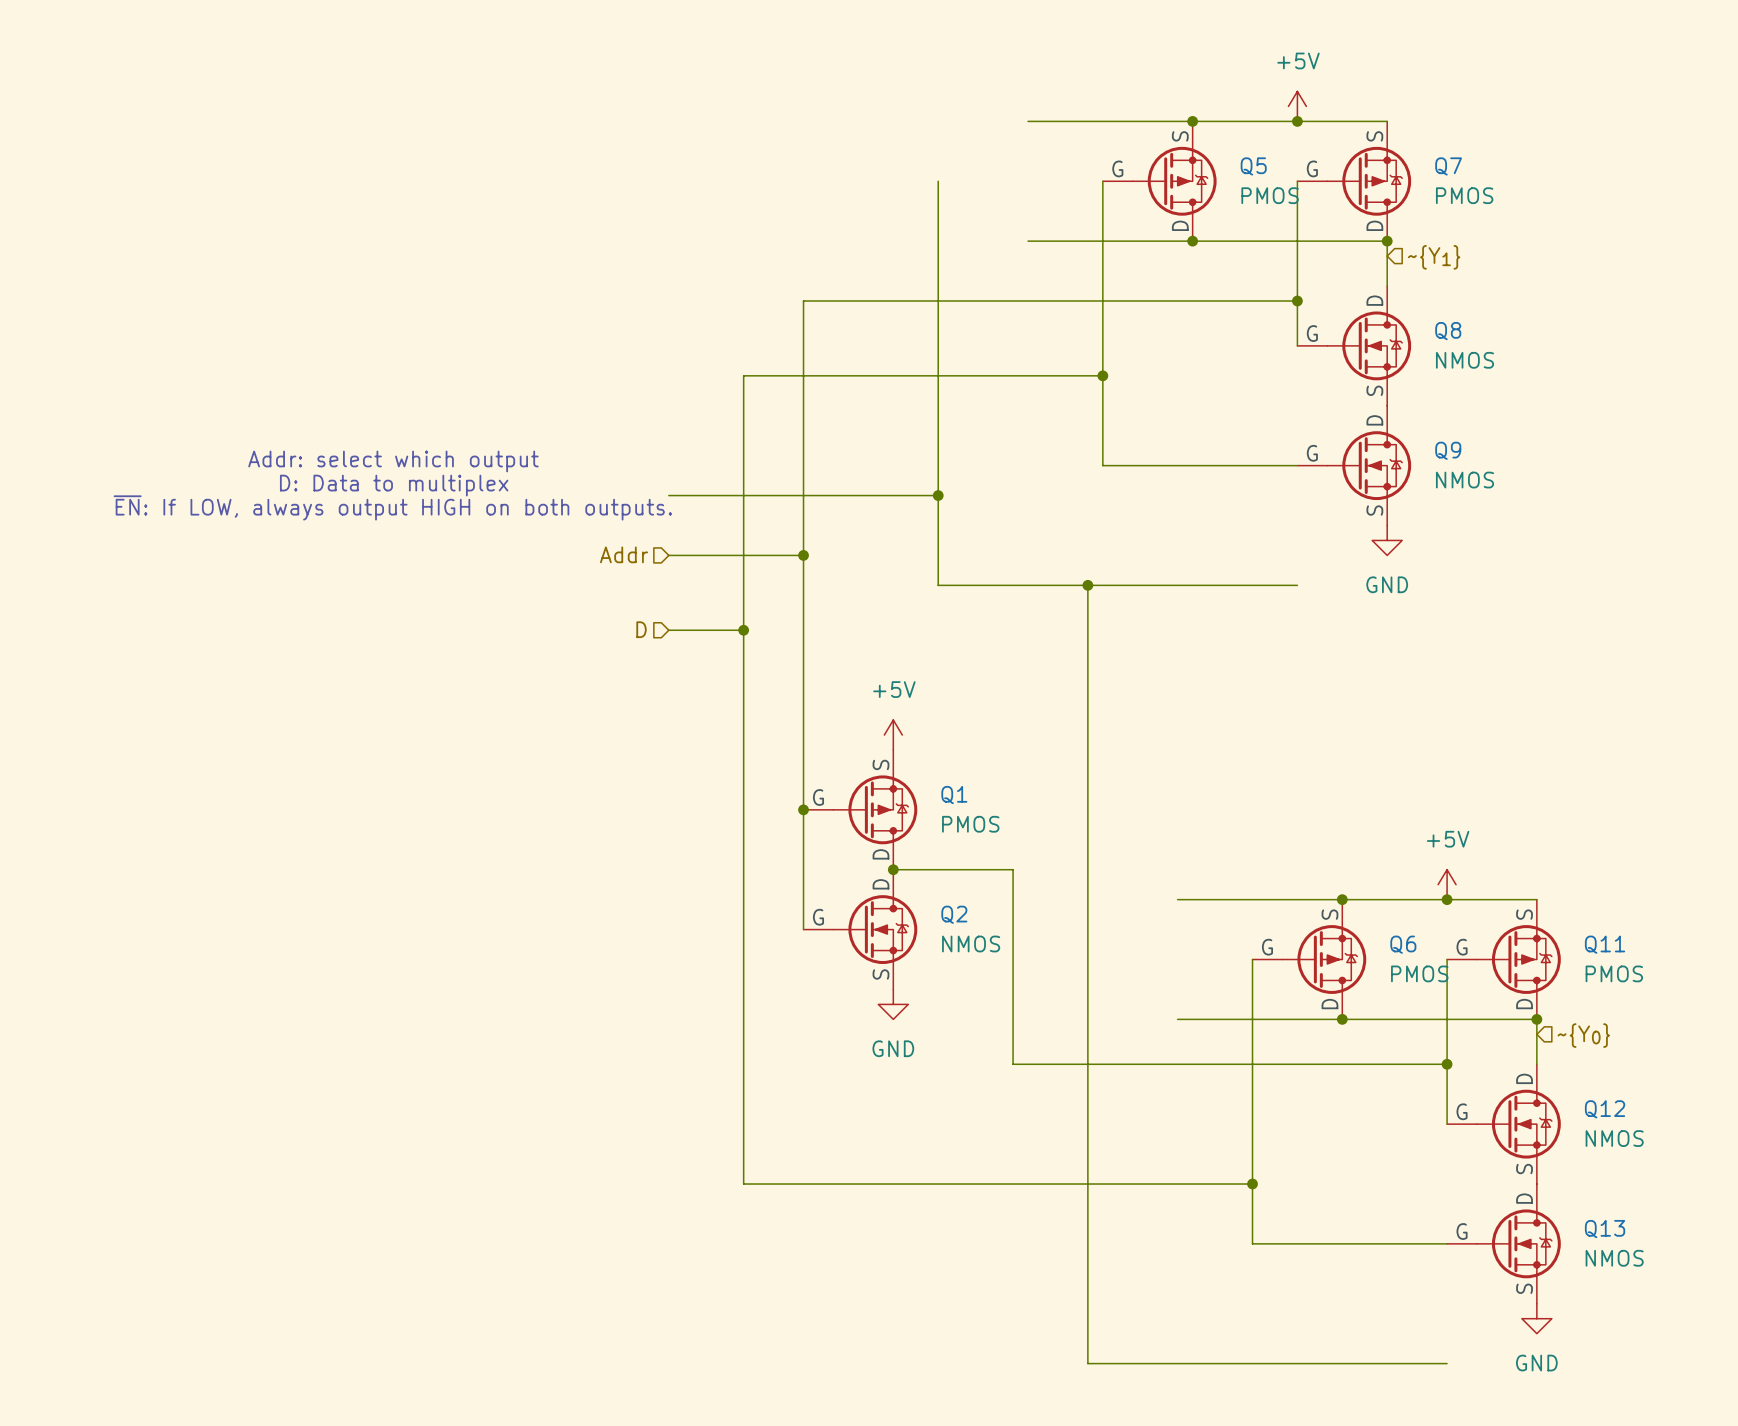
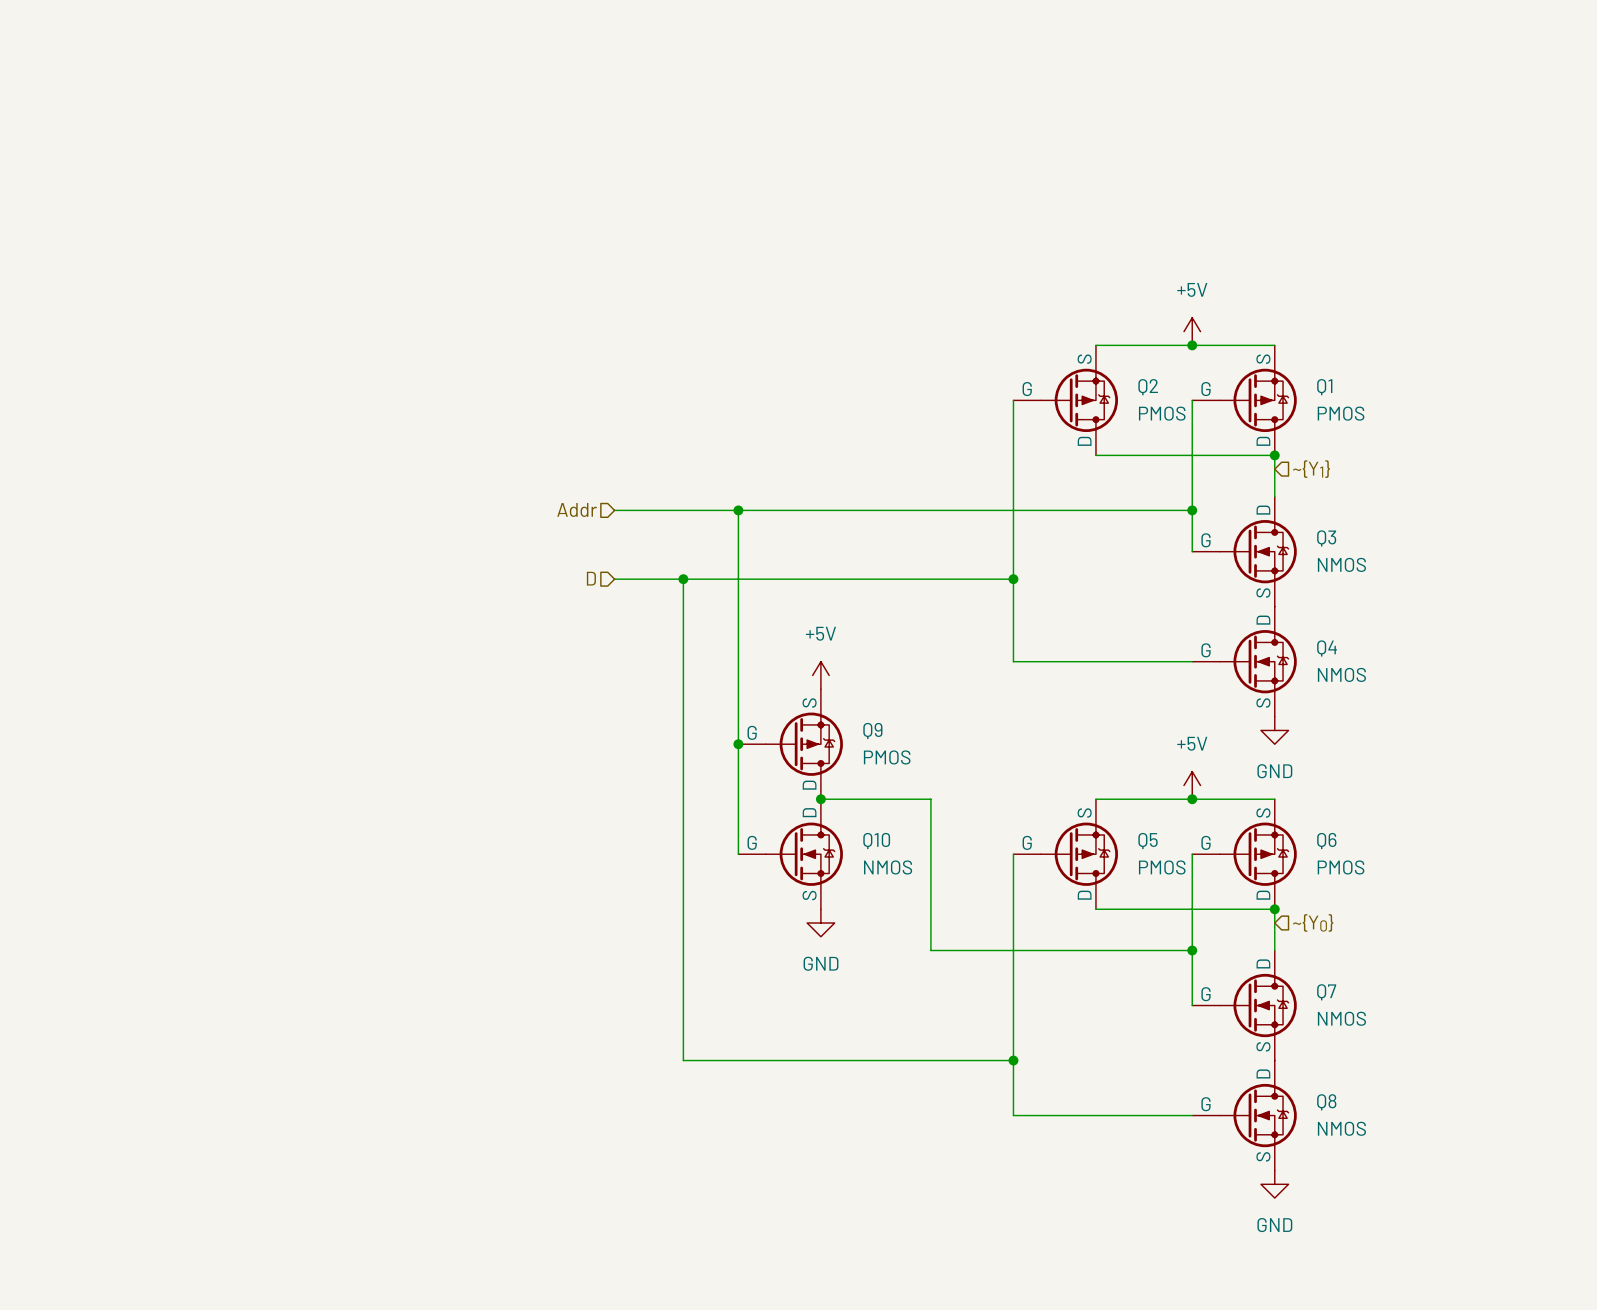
power symbol position: +5V (1297, 106) -> +5V (1192, 331)
wire: (1028, 121) (1387, 121) -> none
junction: (1192, 121) -> none
junction: (1297, 121) -> none
Q7 symbol: [1297, 121, 1412, 242] -> [1192, 950, 1297, 1061]
wire: (938, 181) (938, 585) (1297, 585) -> none
wire: (1102, 181) (1102, 435) -> none
Q5 position: (1159, 181) -> (1065, 854)
wire: (1297, 181) (1297, 345) -> (1192, 400) (1192, 551)
Q7 value: PMOS (1464, 195) -> NMOS (1341, 1018)
wire: (1028, 241) (1387, 241) (1387, 286) -> none
junction: (1192, 241) -> none
junction: (1387, 241) -> none
hierarchical label position: ~{Y1} (1434, 257) -> ~{Y1} (1311, 469)
wire: (1297, 301) (803, 301) (803, 555) -> (1192, 510) (738, 510)
junction: (1297, 301) -> none
Q8 position: (1354, 345) -> (1244, 1115)
wire: (1102, 375) (743, 375) (743, 630) -> (1013, 579) (683, 579)
junction: (1102, 375) -> none
wire: none -> (1095, 345) (1274, 345)
junction: none -> (1192, 345)
Q2: none -> PMOS (1065, 400)
Q1: none -> PMOS (1244, 400)
text: Addr: select which output (393, 461) -> none
wire: (1102, 465) (1297, 465) -> (1013, 427) (1013, 661) (1192, 661)
Q9: NMOS (1354, 465) -> none
text: D: Data to multiplex (394, 485) -> none
wire: (668, 495) (938, 495) -> none
junction: (938, 495) -> none
wire: none -> (1095, 455) (1274, 455) (1274, 496)
junction: none -> (1274, 455)
text: ~{EN}: If LOW, always output HIGH on both outputs. (392, 507) -> none
power symbol position: GND (1387, 540) -> GND (1274, 730)
junction: none -> (1192, 510)
wire: (1087, 585) (1087, 1363) (1447, 1363) -> none
junction position: (1087, 585) -> (1013, 579)
Q3: none -> NMOS (1244, 551)
Q4: none -> NMOS (1244, 661)
Q1 name: Q1 (954, 795) -> Q9 (872, 730)
wire: none -> (1095, 799) (1274, 799)
junction: none -> (1192, 799)
power symbol position: +5V (1447, 884) -> +5V (1192, 785)
wire: (1177, 899) (1536, 899) -> none
junction: (1342, 899) -> none
junction: (1447, 899) -> none
Q2 name: Q2 (954, 914) -> Q10 (876, 841)
wire: (1252, 959) (1252, 1243) (1447, 1243) -> (1013, 854) (1013, 1115) (1192, 1115)
Q6 position: (1309, 959) -> (1244, 854)
wire: (1447, 959) (1447, 1124) -> (1192, 854) (1192, 1005)
Q11: PMOS (1503, 959) -> none
wire: none -> (1095, 909) (1274, 909) (1274, 950)
junction: none -> (1274, 909)
wire: (1177, 1019) (1536, 1019) (1536, 1064) -> none
junction: (1342, 1019) -> none
junction: (1536, 1019) -> none
wire: (1013, 1034) (1013, 1064) (1447, 1064) -> (930, 950) (1192, 950)
junction: none -> (1192, 950)
hierarchical label position: ~{Y0} (1583, 1035) -> ~{Y0} (1313, 922)
junction: (1447, 1064) -> none
Q12: NMOS (1503, 1124) -> none
wire: (743, 1154) (743, 1184) (1252, 1184) -> (683, 1060) (1013, 1060)
junction: none -> (1013, 1060)
junction: (1252, 1184) -> none
Q13: NMOS (1503, 1243) -> none
power symbol position: GND (1536, 1318) -> GND (1274, 1184)

